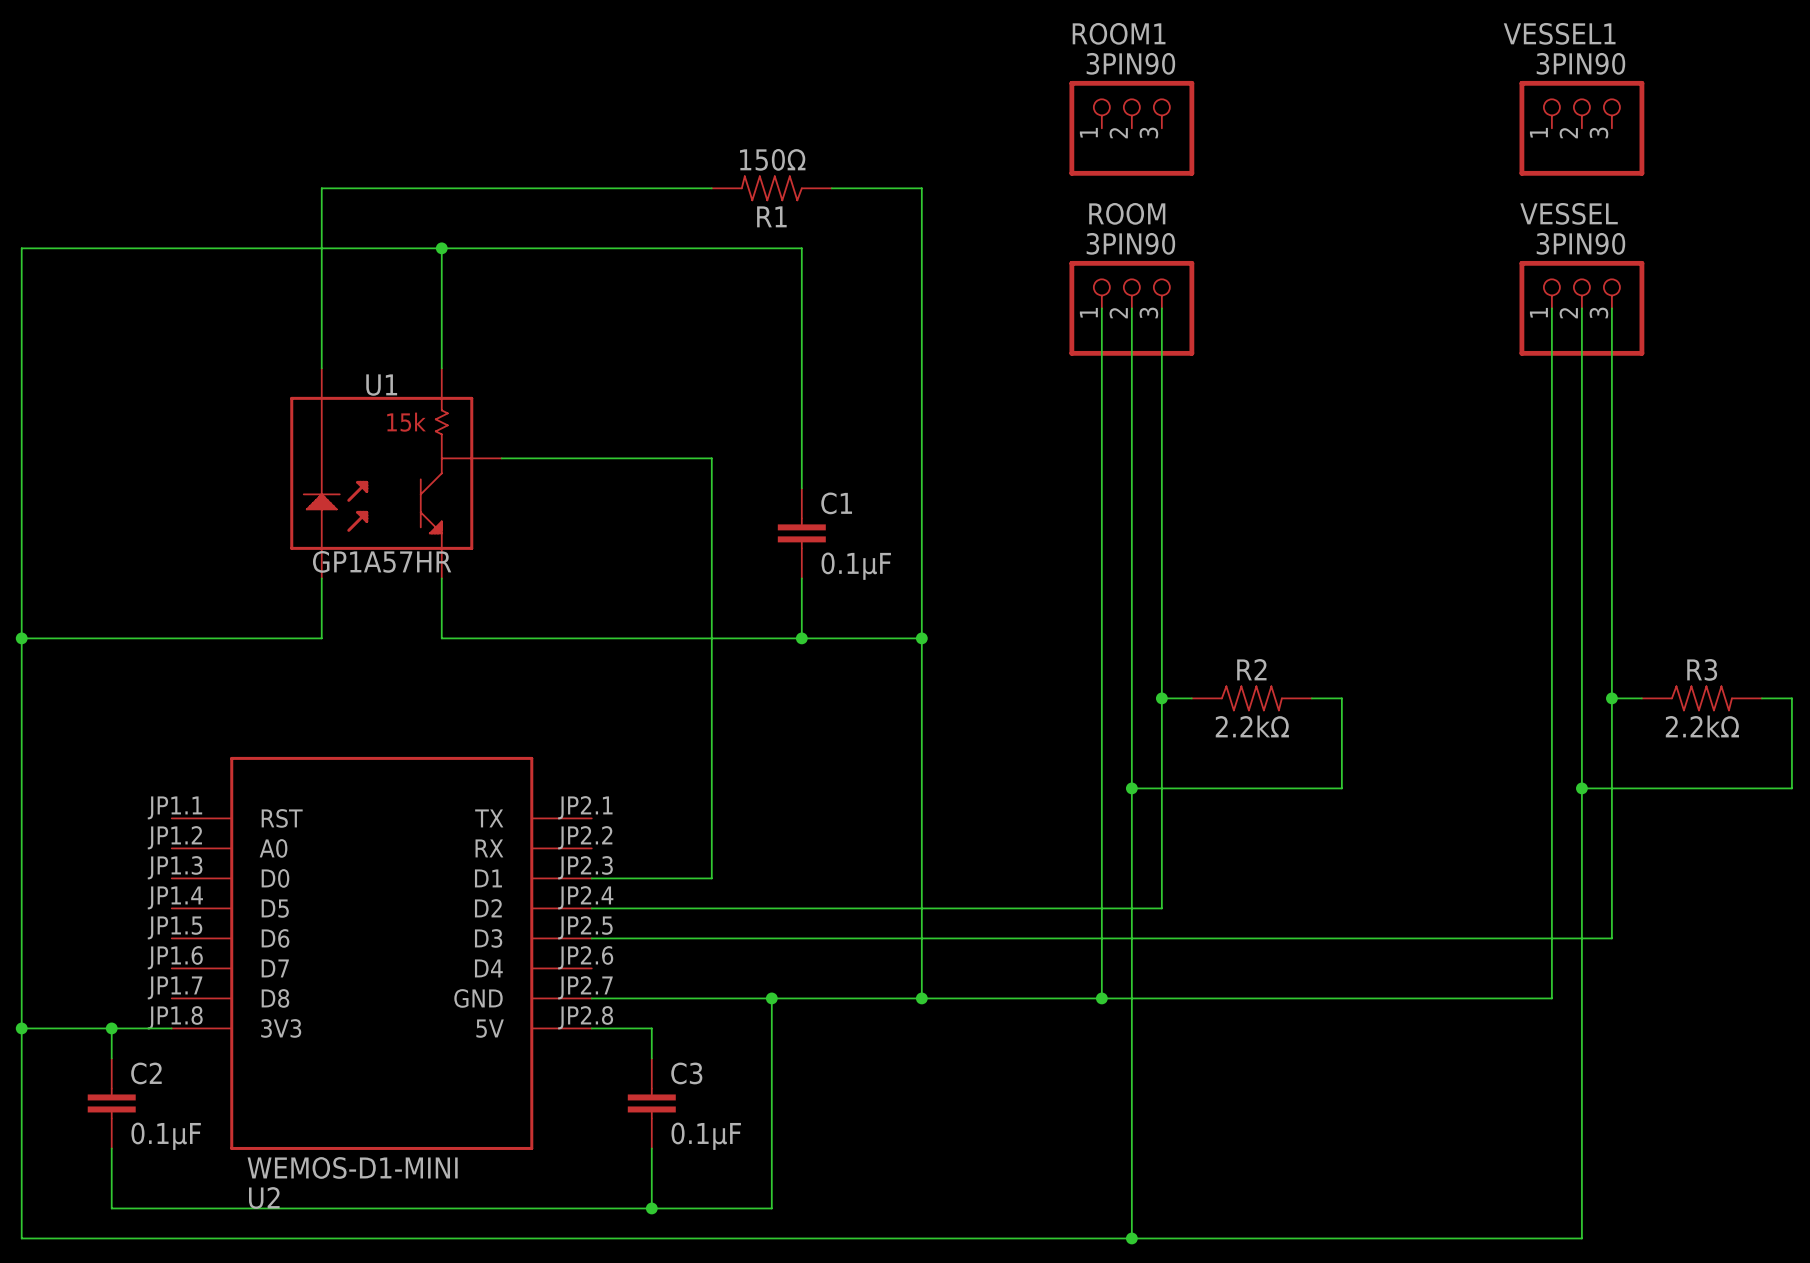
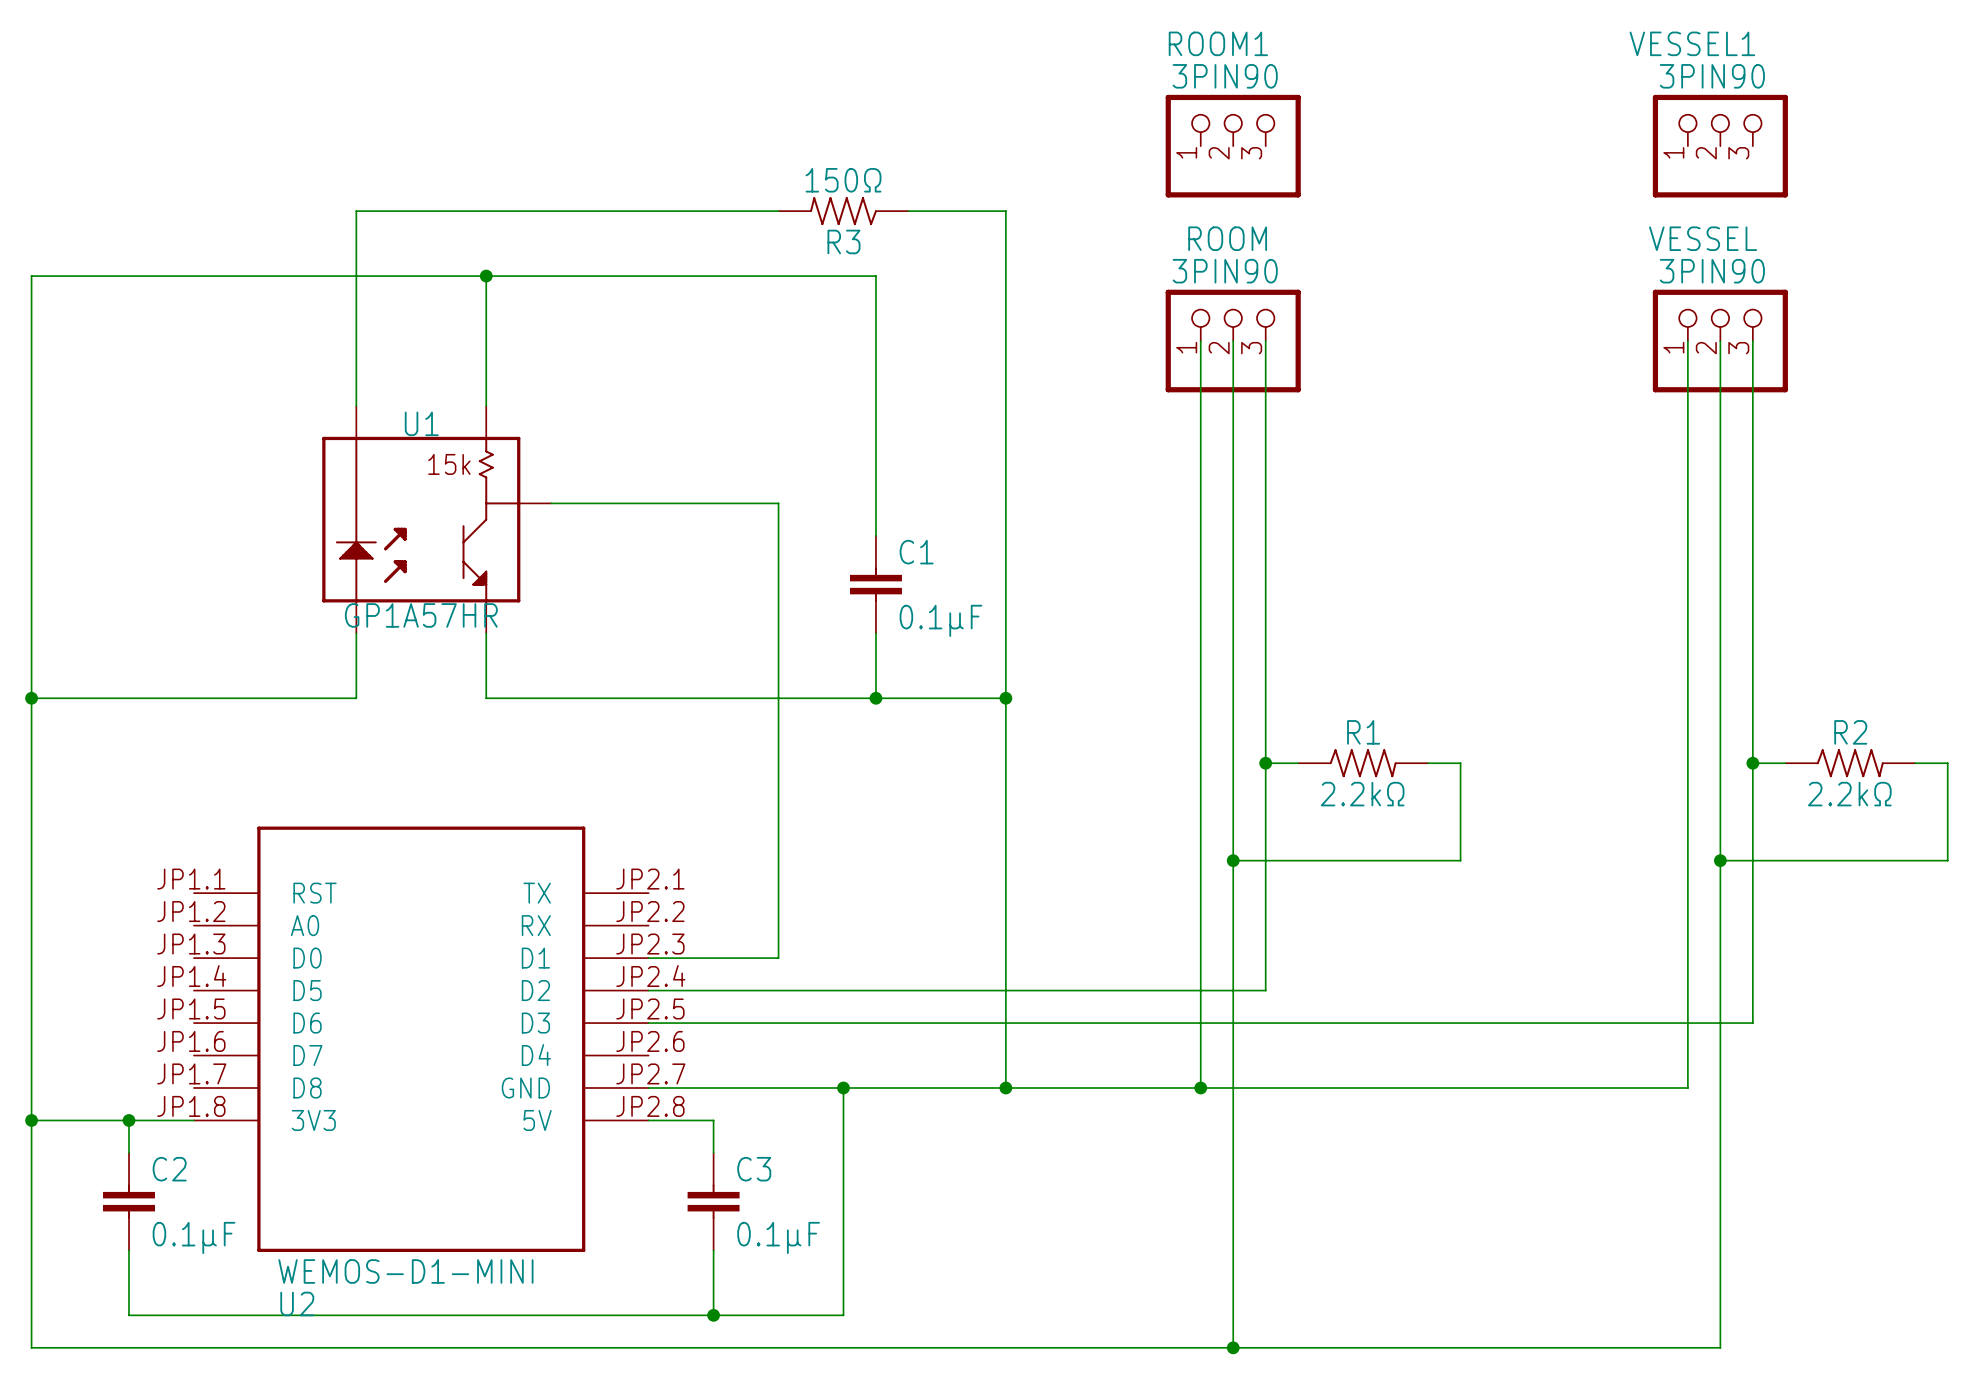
R1 name: R1 (771, 216) -> R3 (843, 241)
R2 name: R2 (1251, 669) -> R1 (1363, 732)
R3 name: R3 (1702, 669) -> R2 (1850, 732)

